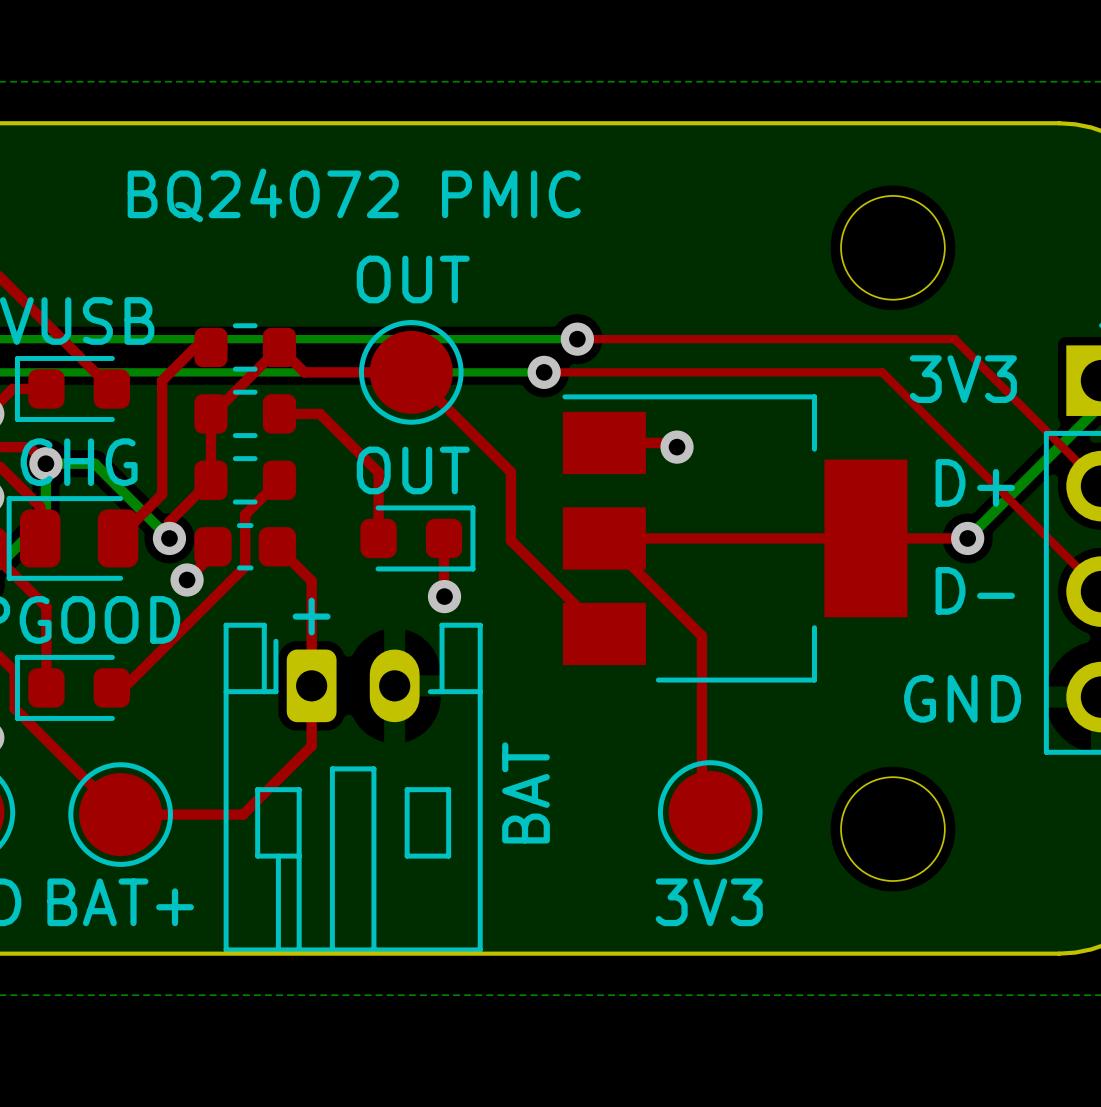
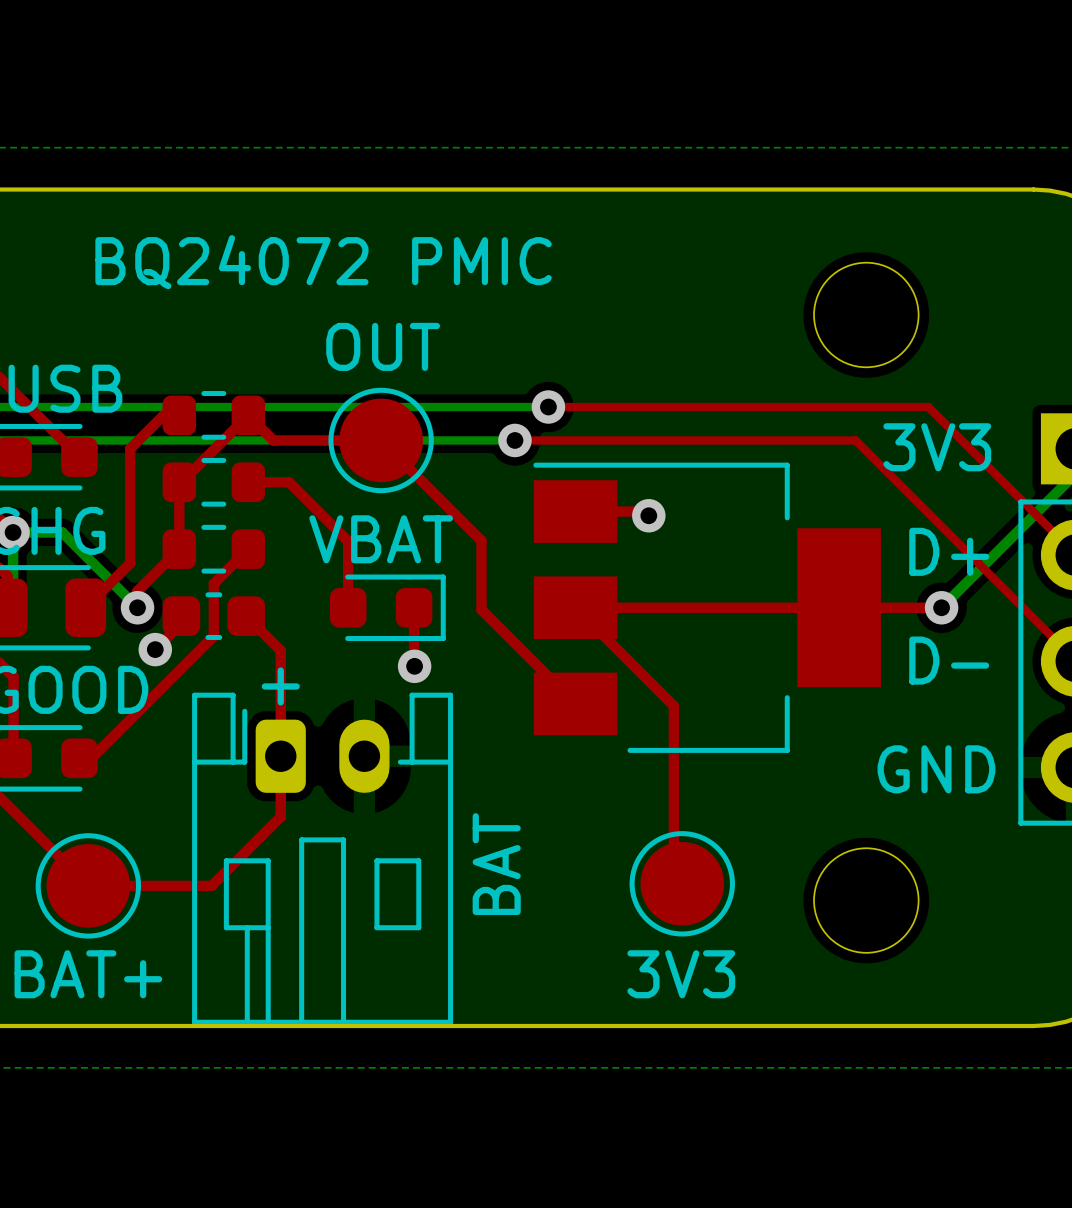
part value: OUT (413, 470) -> VBAT (381, 539)

